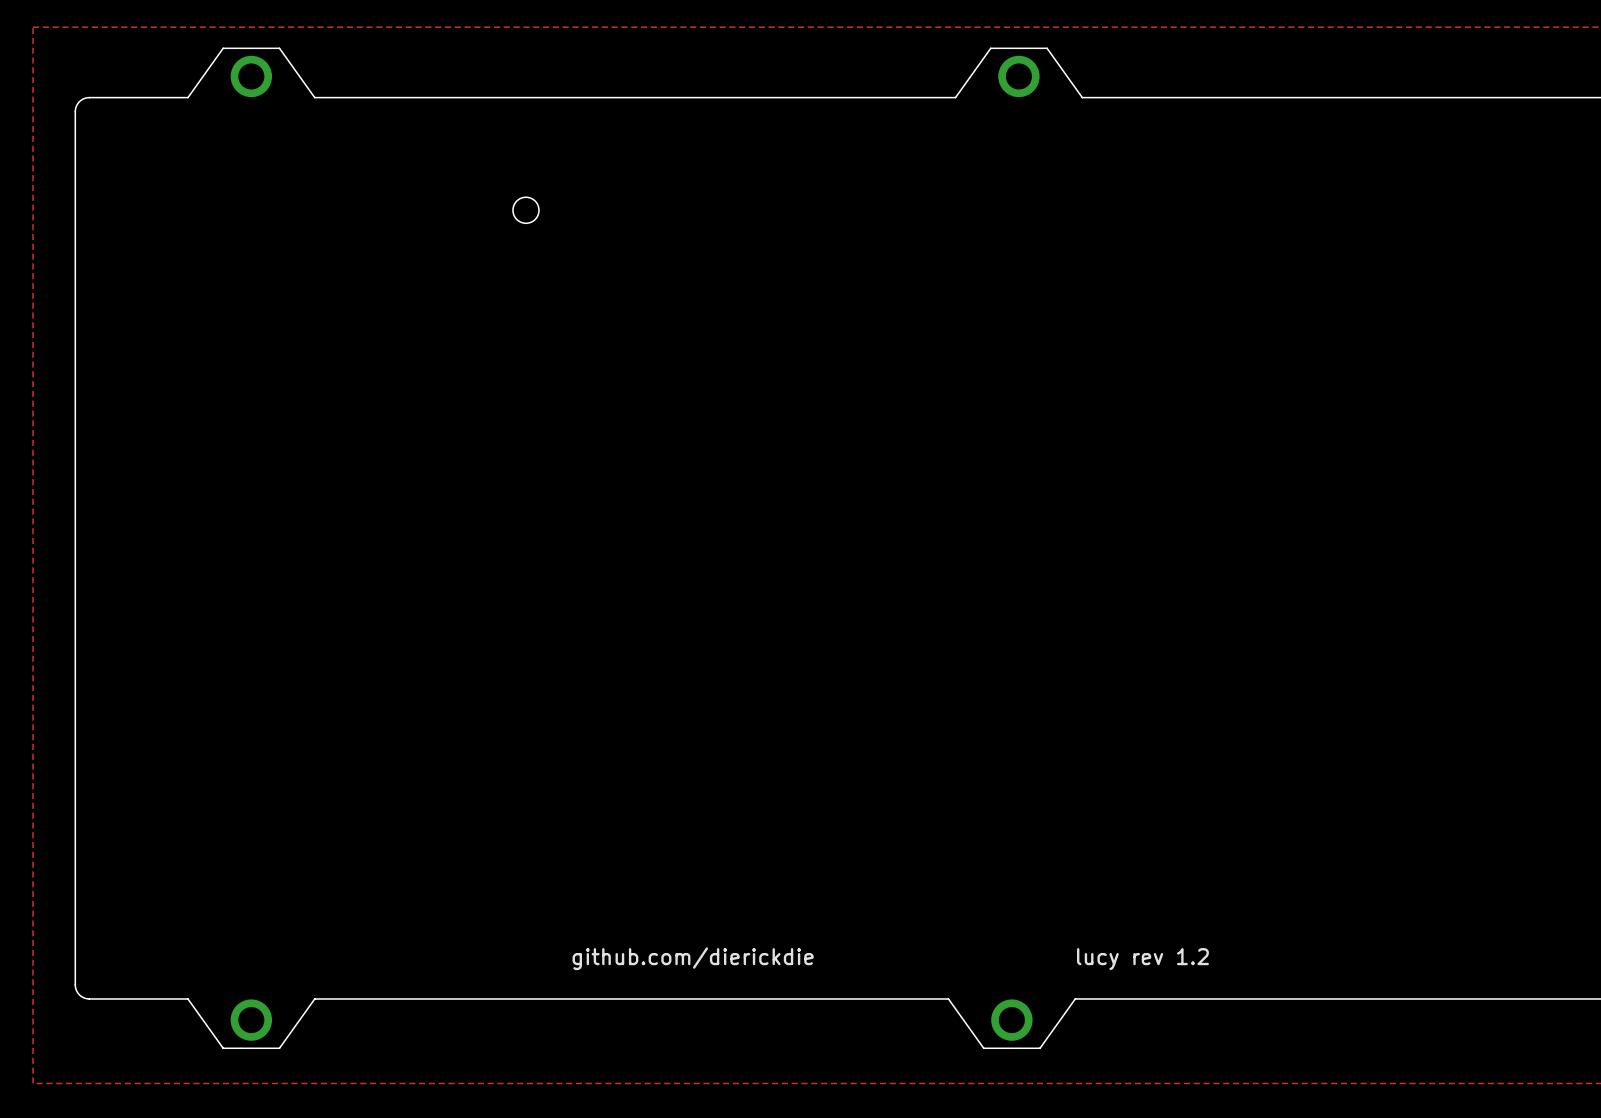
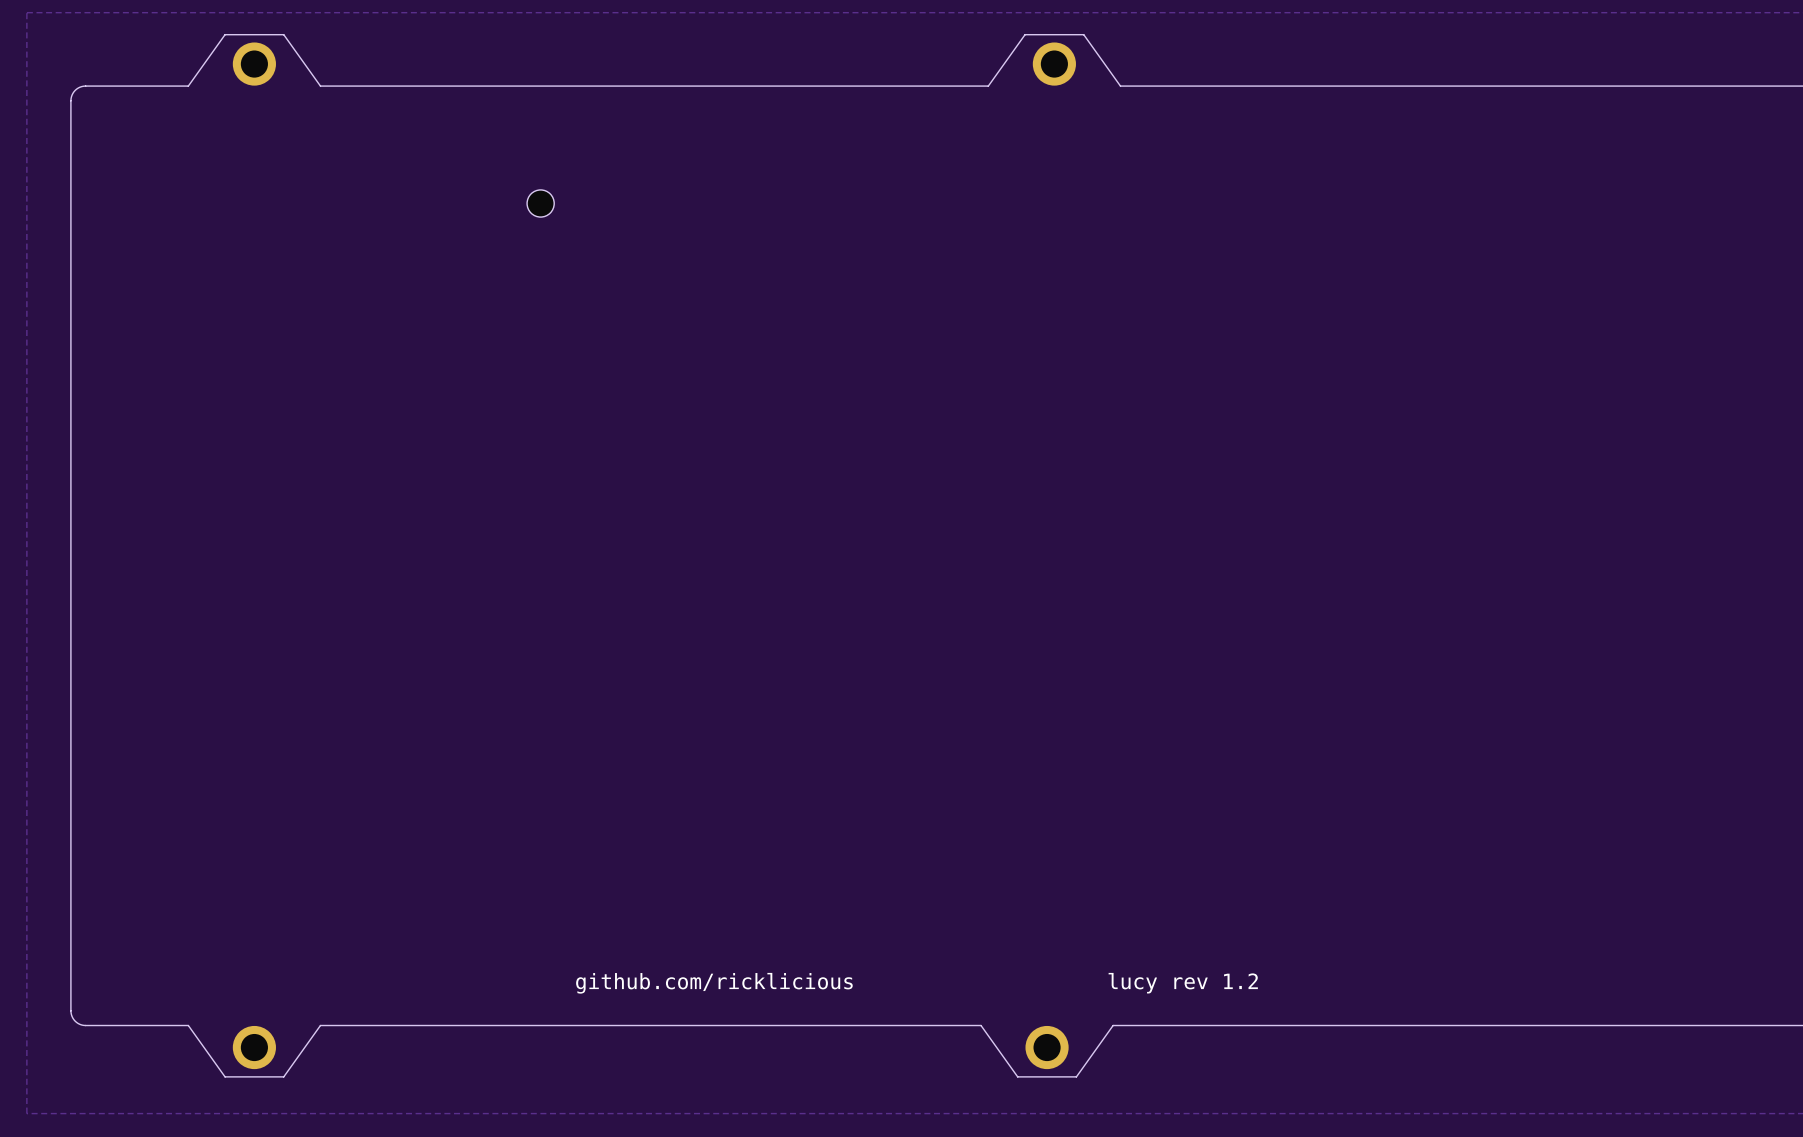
text: github.com/dierickdie (693, 958) -> github.com/ricklicious (714, 983)

